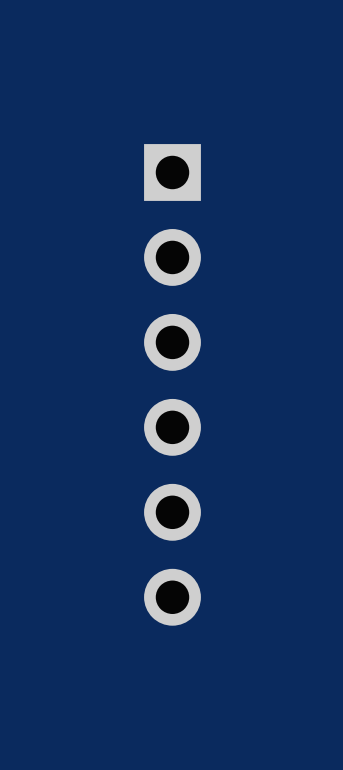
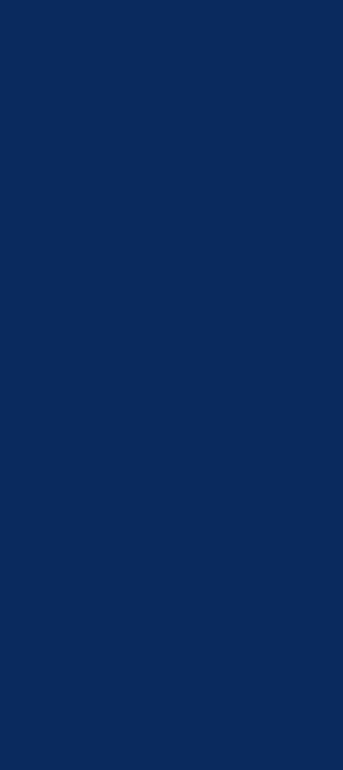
part: (172, 384) -> none

